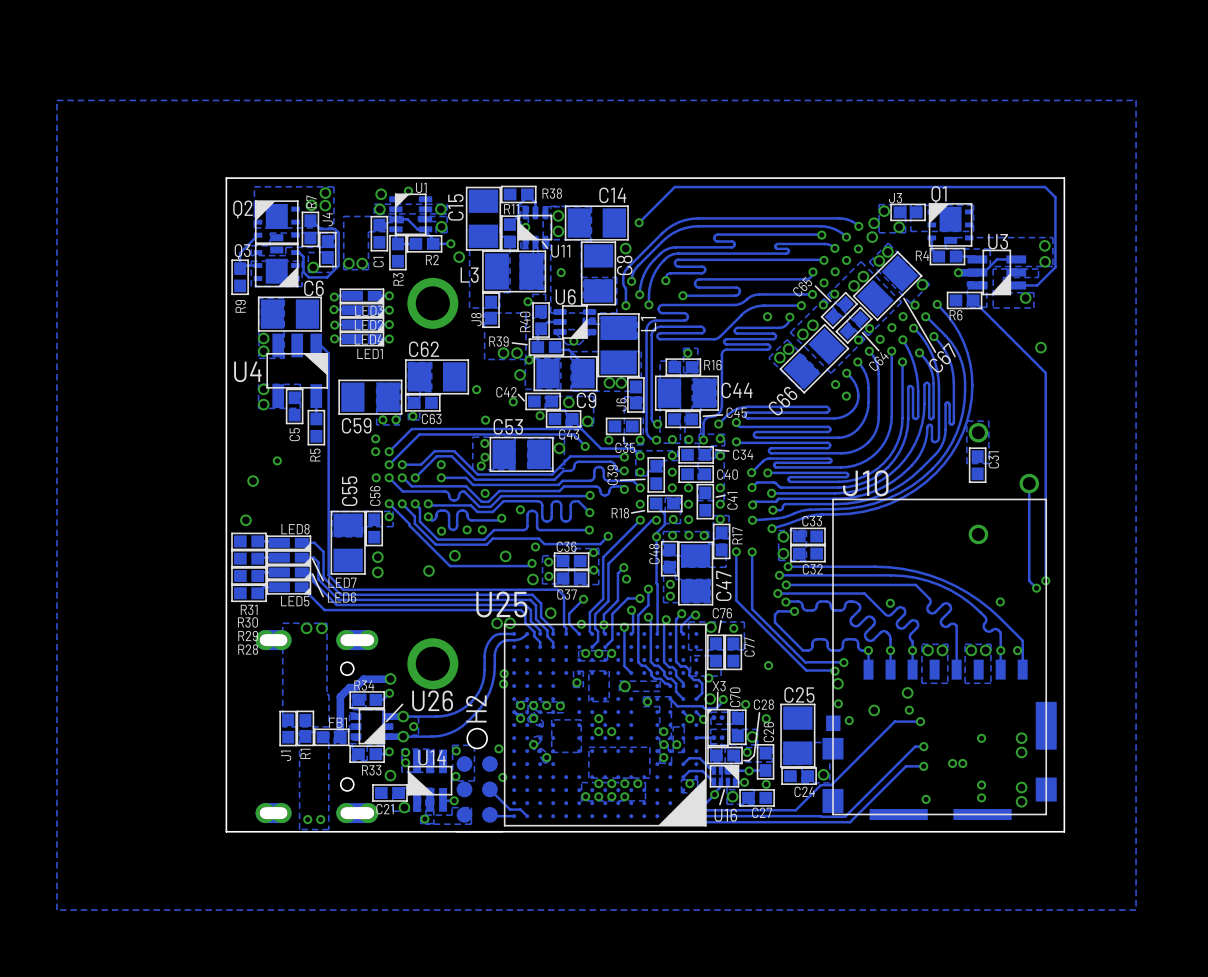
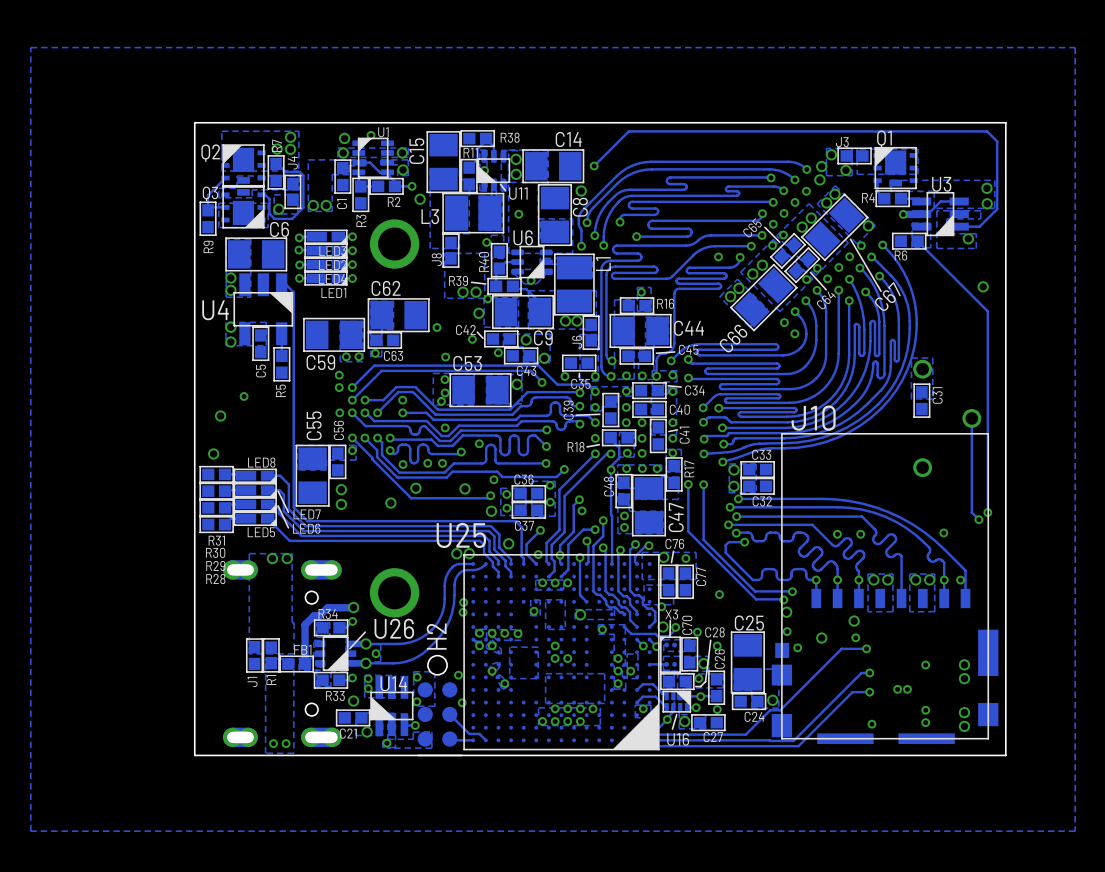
via: none -> (860, 534)

